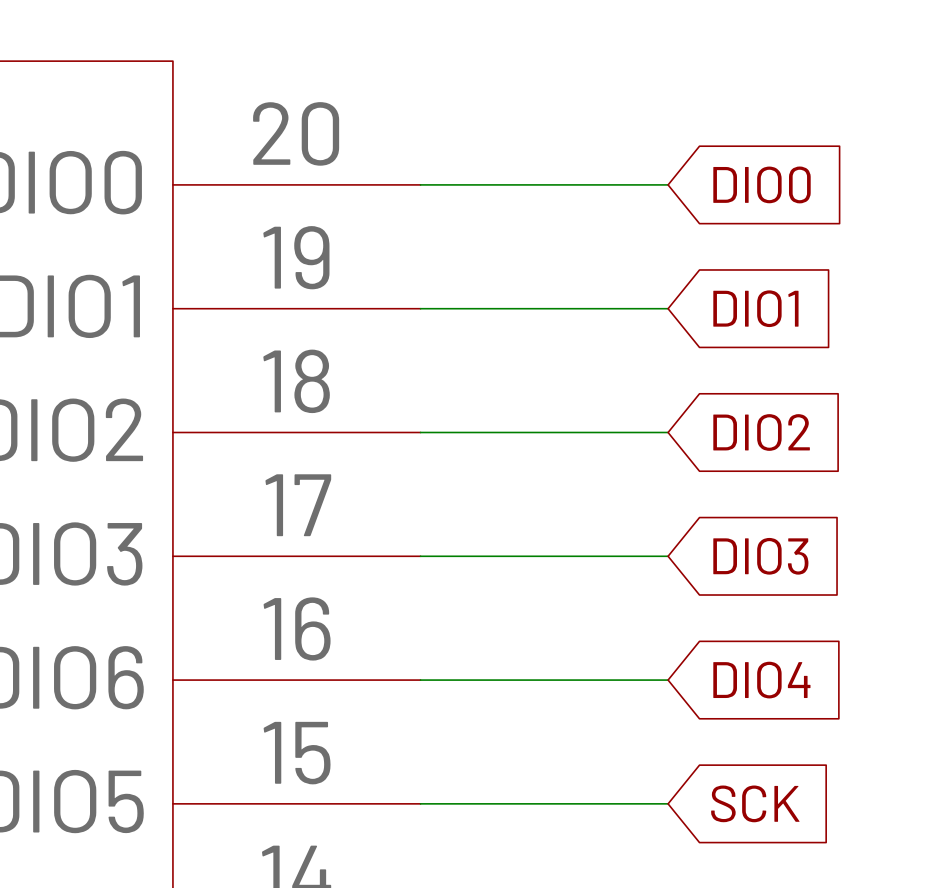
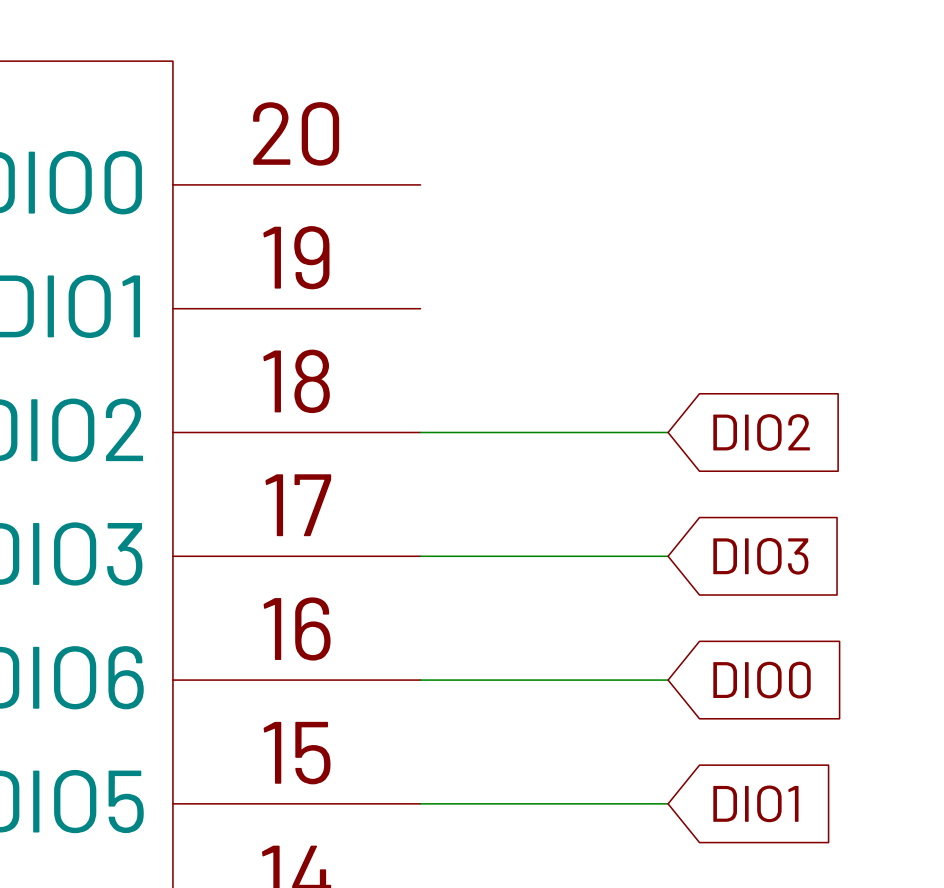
wire: (420, 184) (668, 184) -> none
global label: DIO0 (762, 184) -> none
wire: (420, 308) (668, 308) -> none
global label: DIO1 (755, 308) -> none
global label: DIO4 (761, 680) -> DIO0 (762, 680)
global label: SCK (755, 803) -> DIO1 (755, 803)

